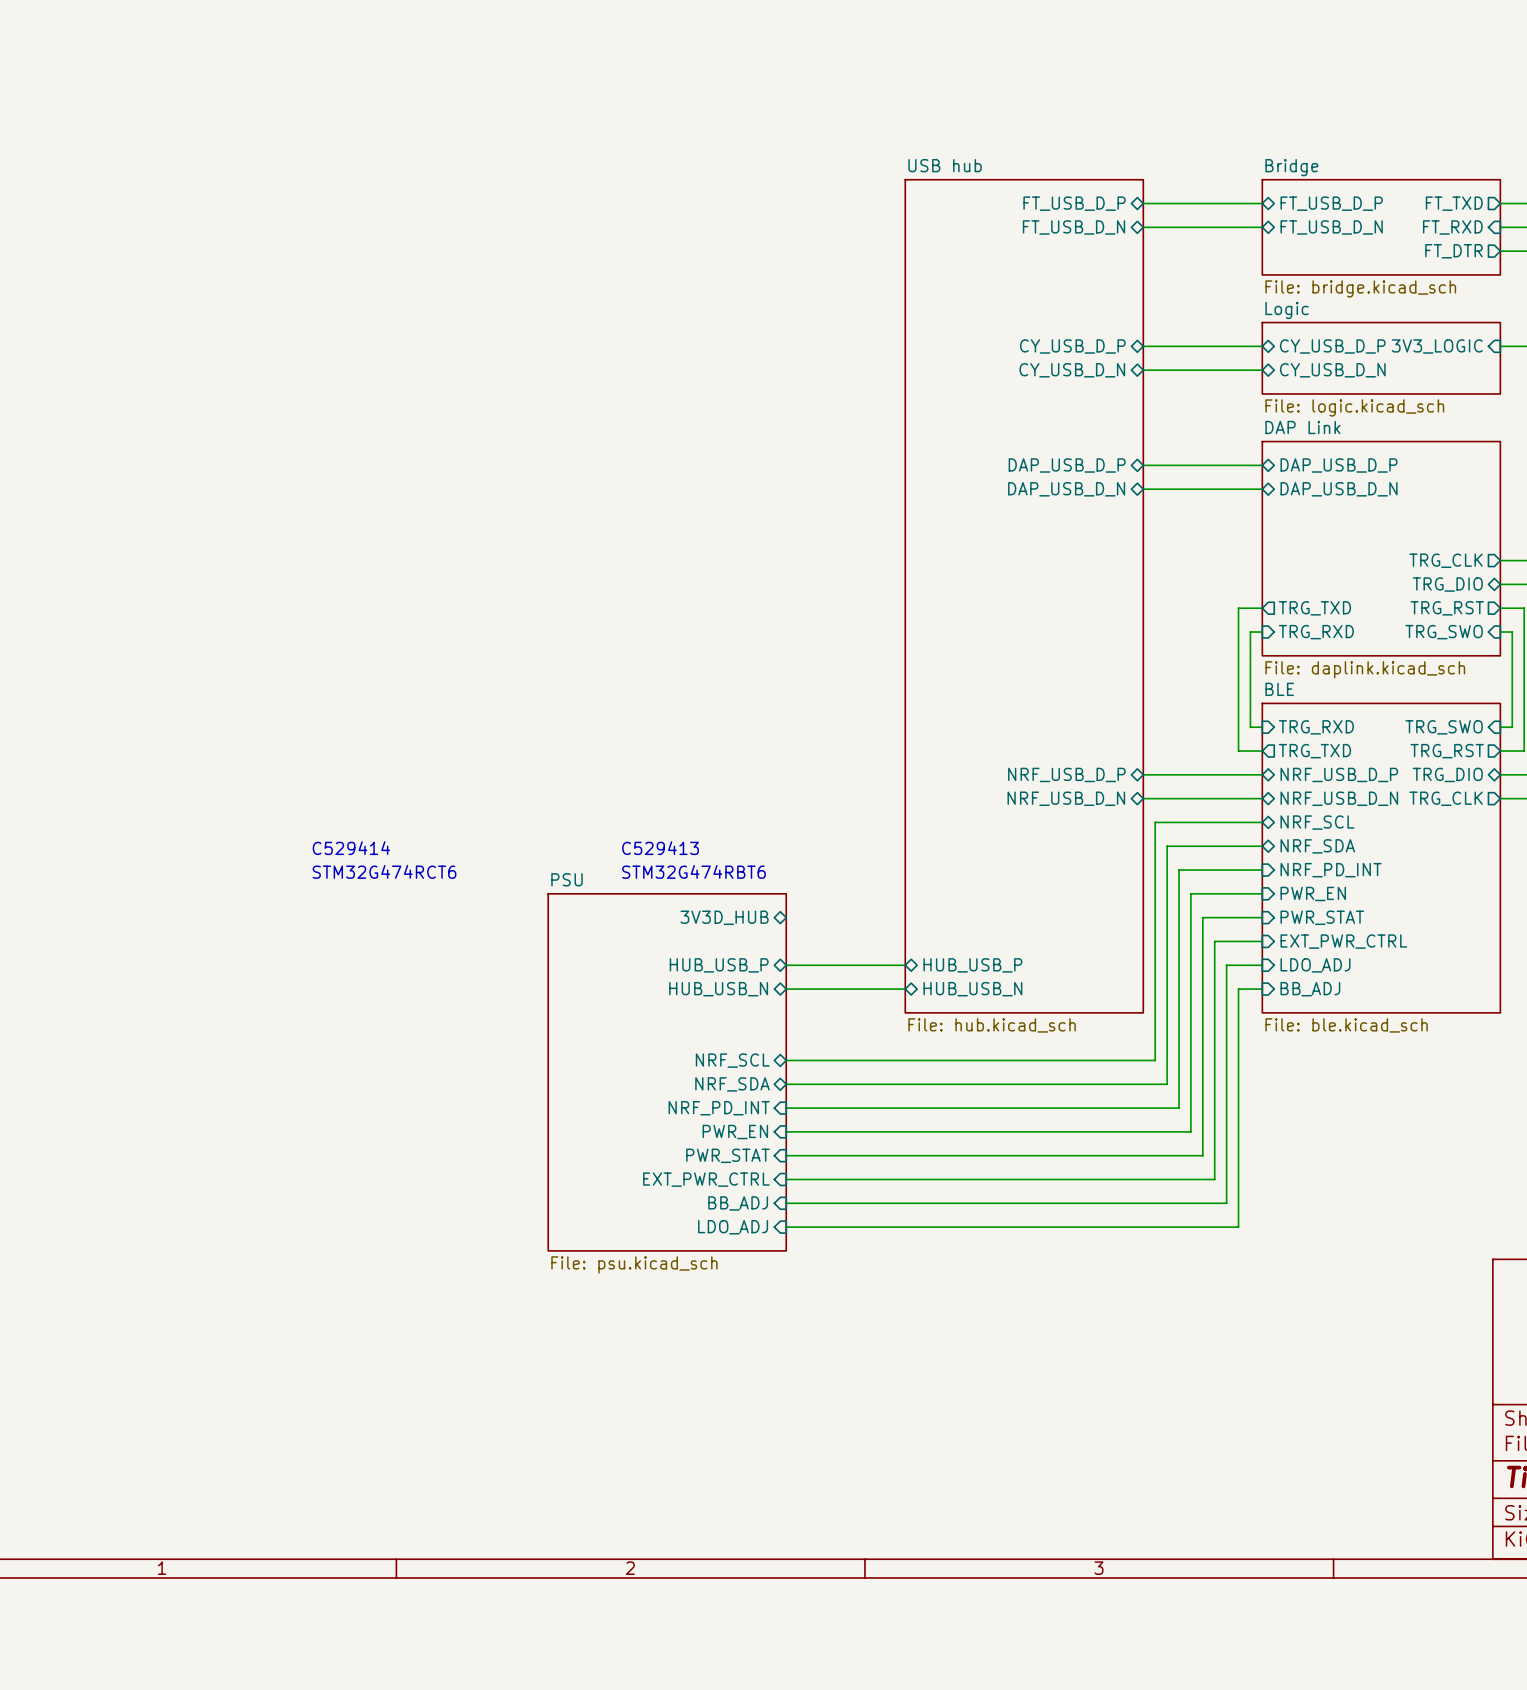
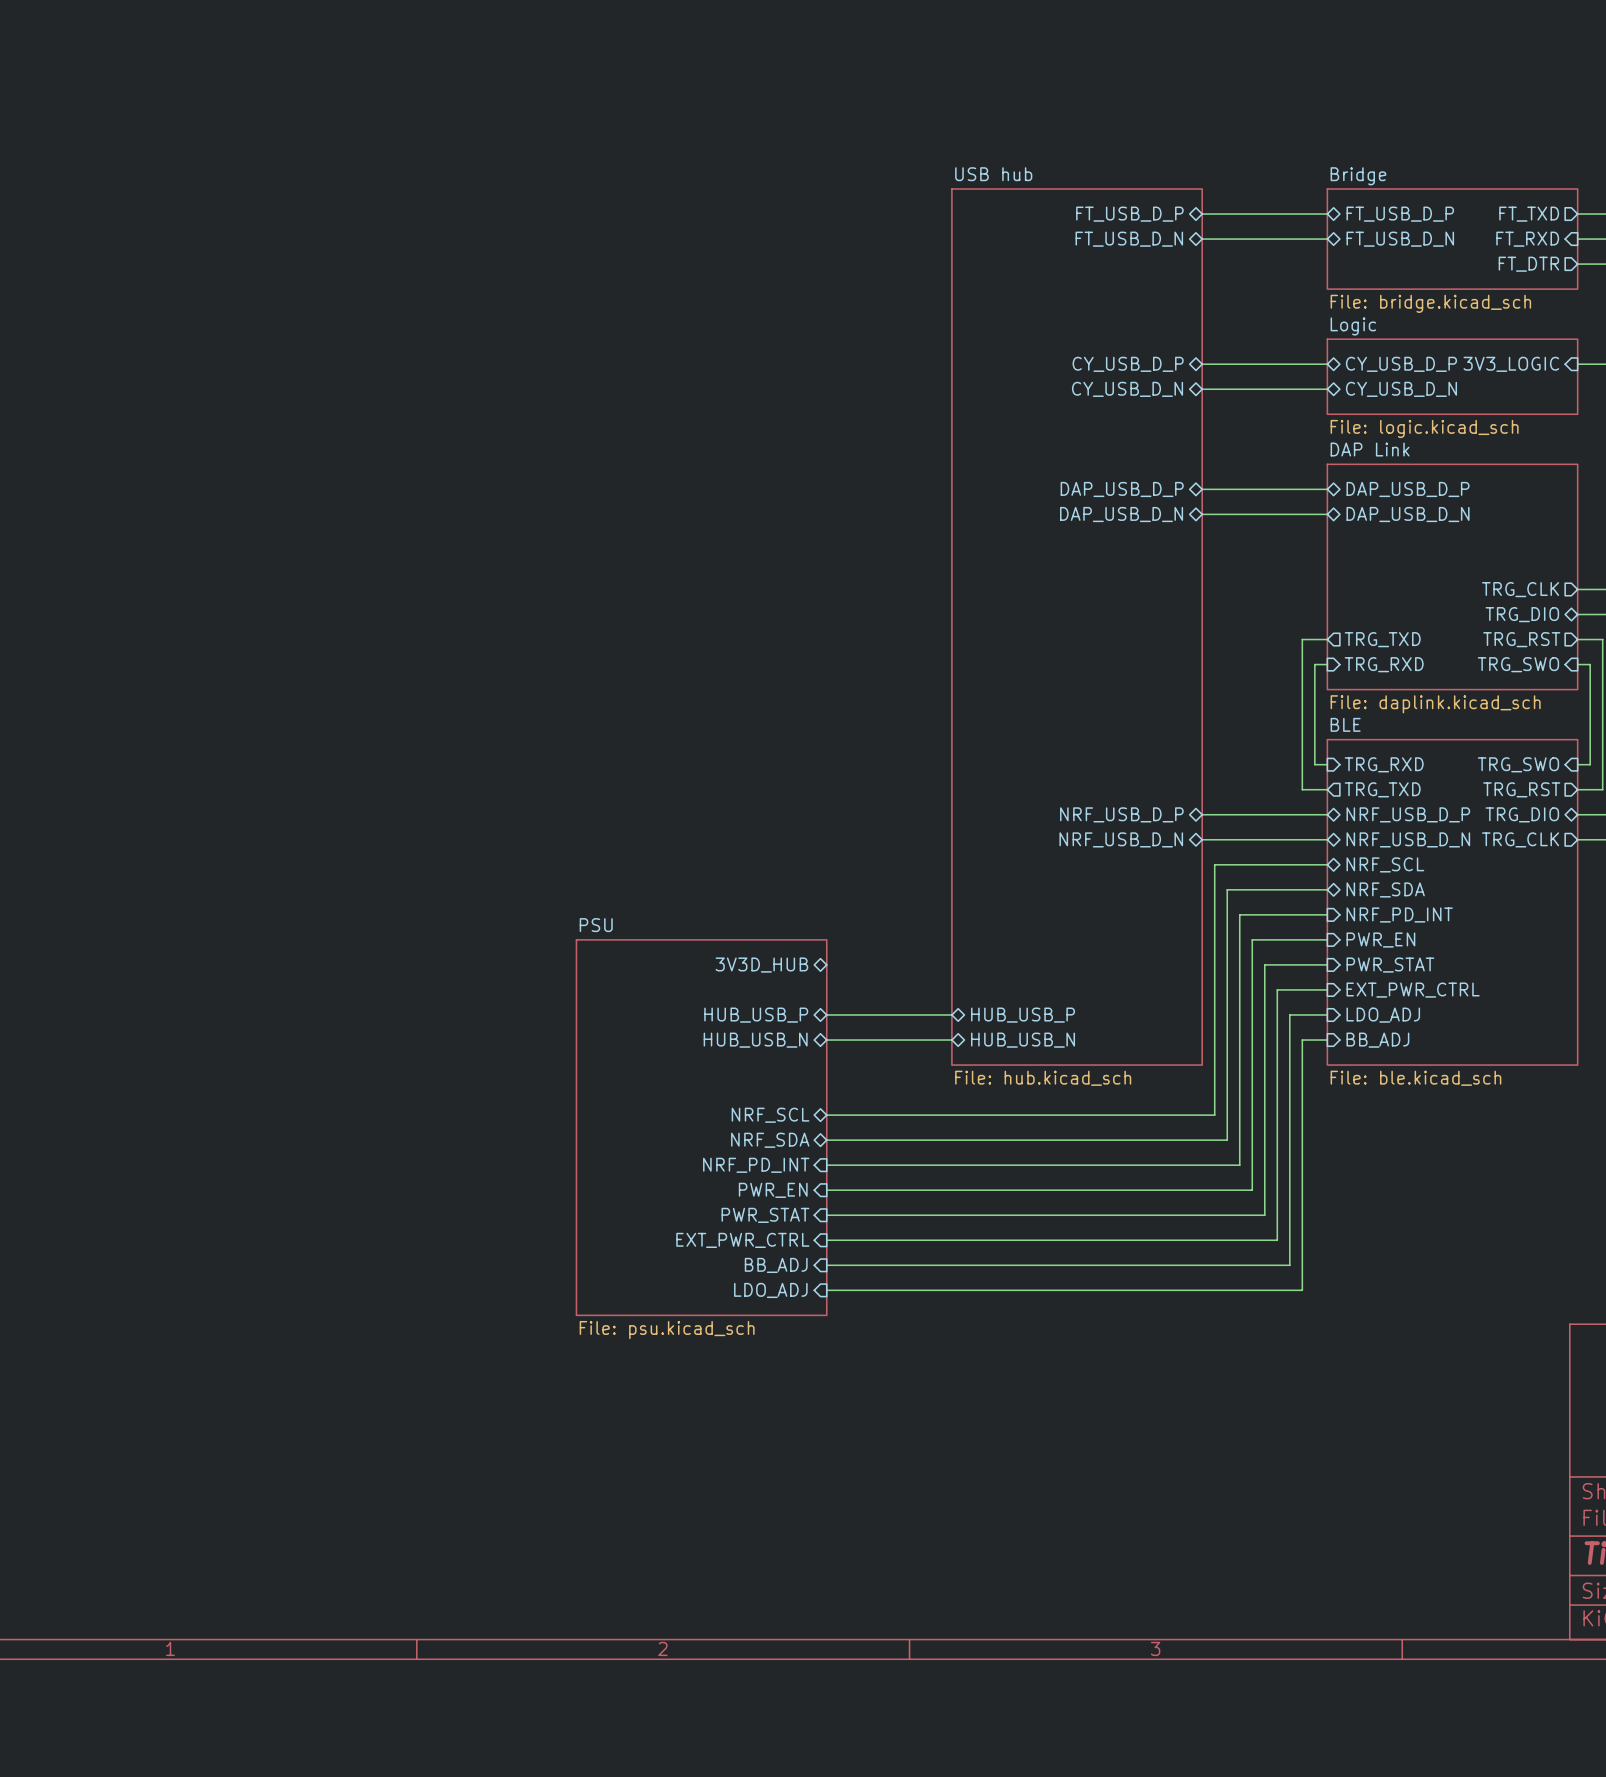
text: C529414 (351, 848) -> none
text: C529413 (660, 848) -> none
text: STM32G474RCT6 (384, 871) -> none
text: STM32G474RBT6 (693, 871) -> none

